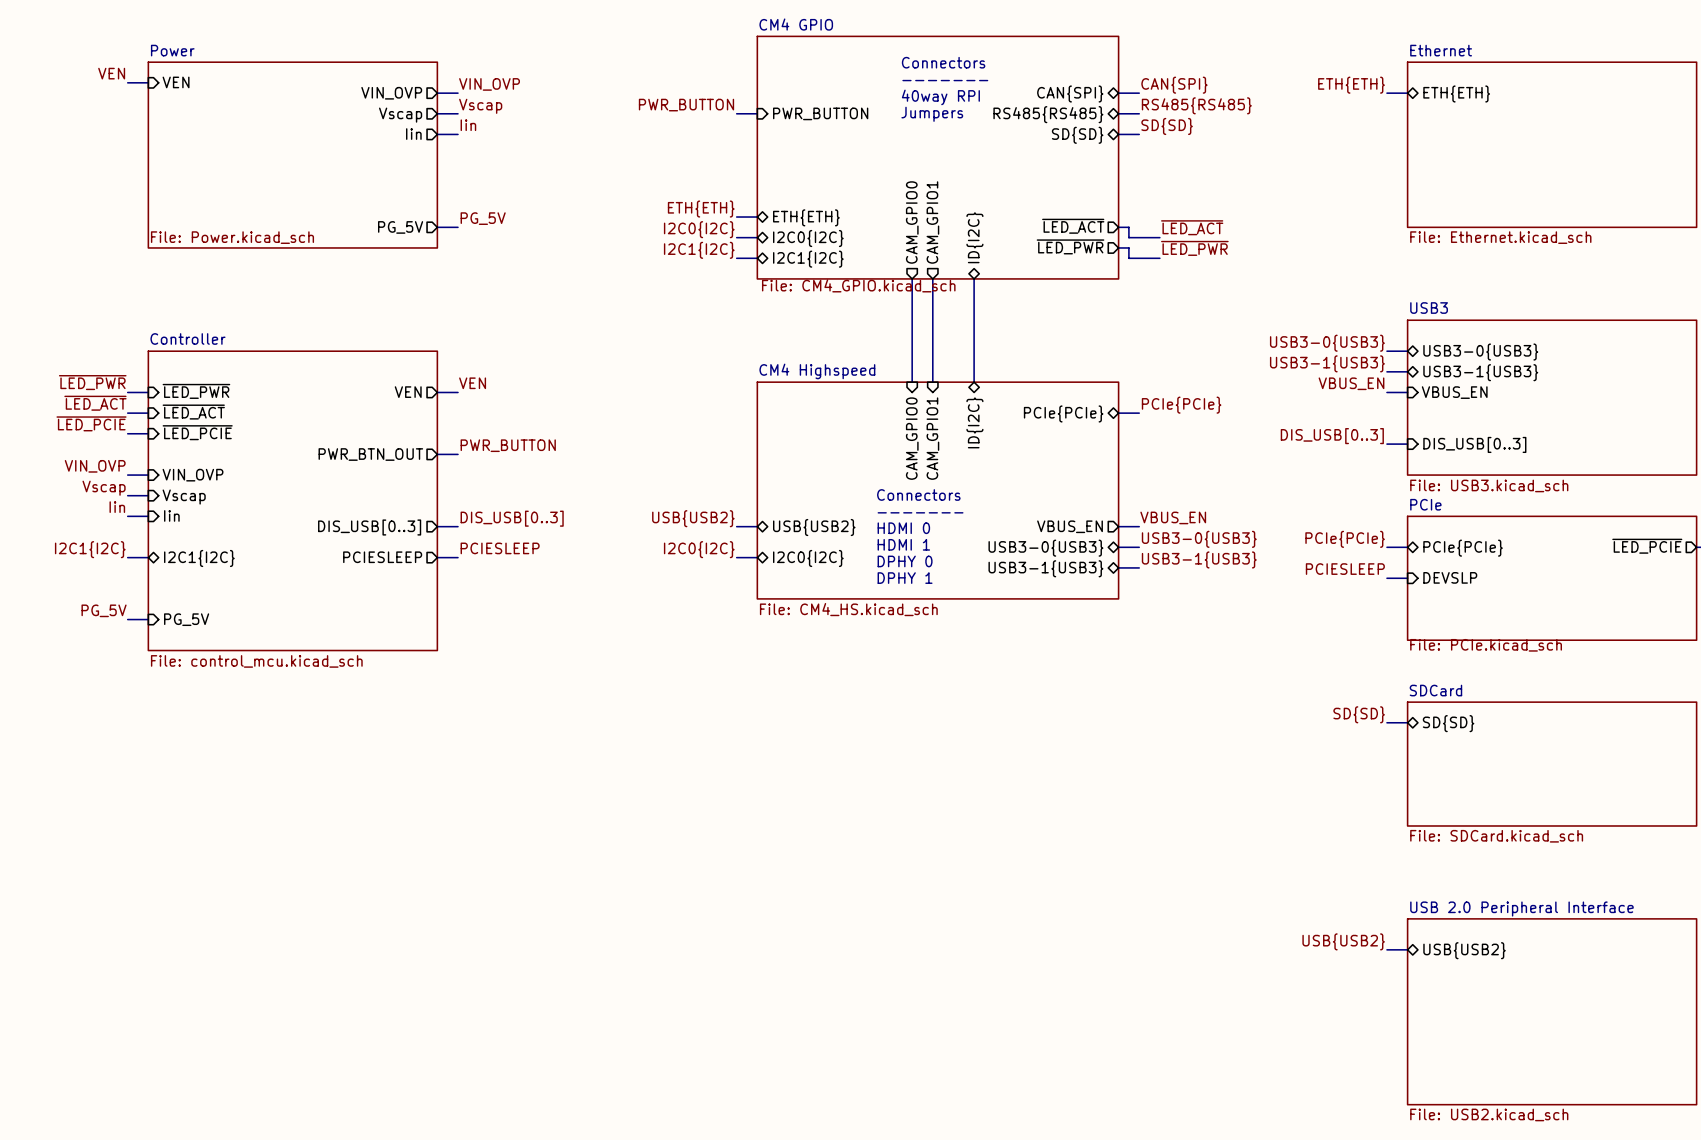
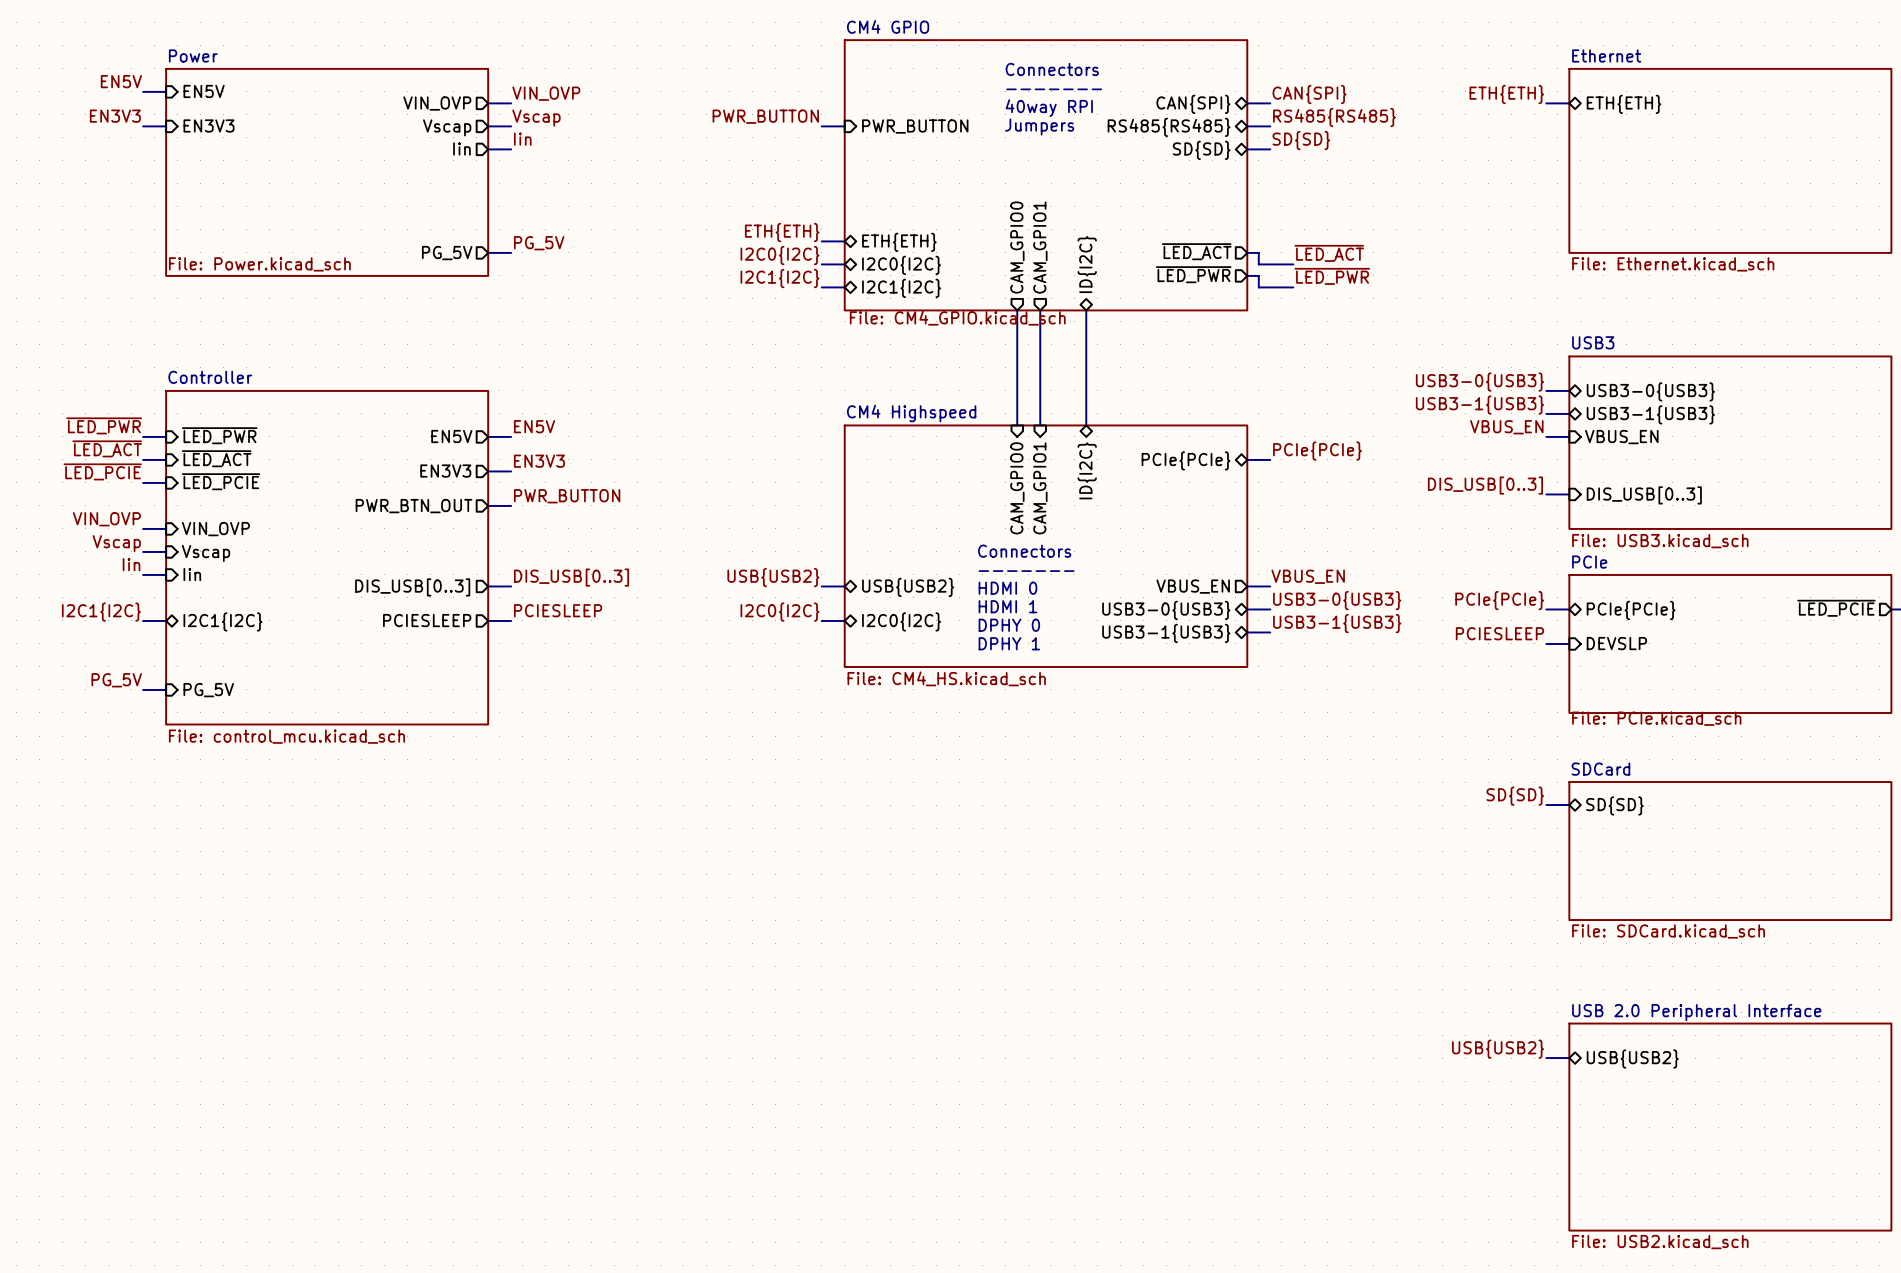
label: VEN (111, 73) -> EN5V (121, 81)
sheet pin: VEN (176, 82) -> EN5V (204, 91)
label: none -> EN3V3 (115, 116)
wire: none -> (143, 126) (166, 126)
sheet pin: none -> EN3V3 (209, 125)
label: VEN (472, 383) -> EN5V (534, 426)
sheet pin: VEN (408, 392) -> EN5V (451, 436)
label: none -> EN3V3 (539, 461)
sheet pin: none -> EN3V3 (445, 471)
wire: none -> (488, 471) (511, 471)

